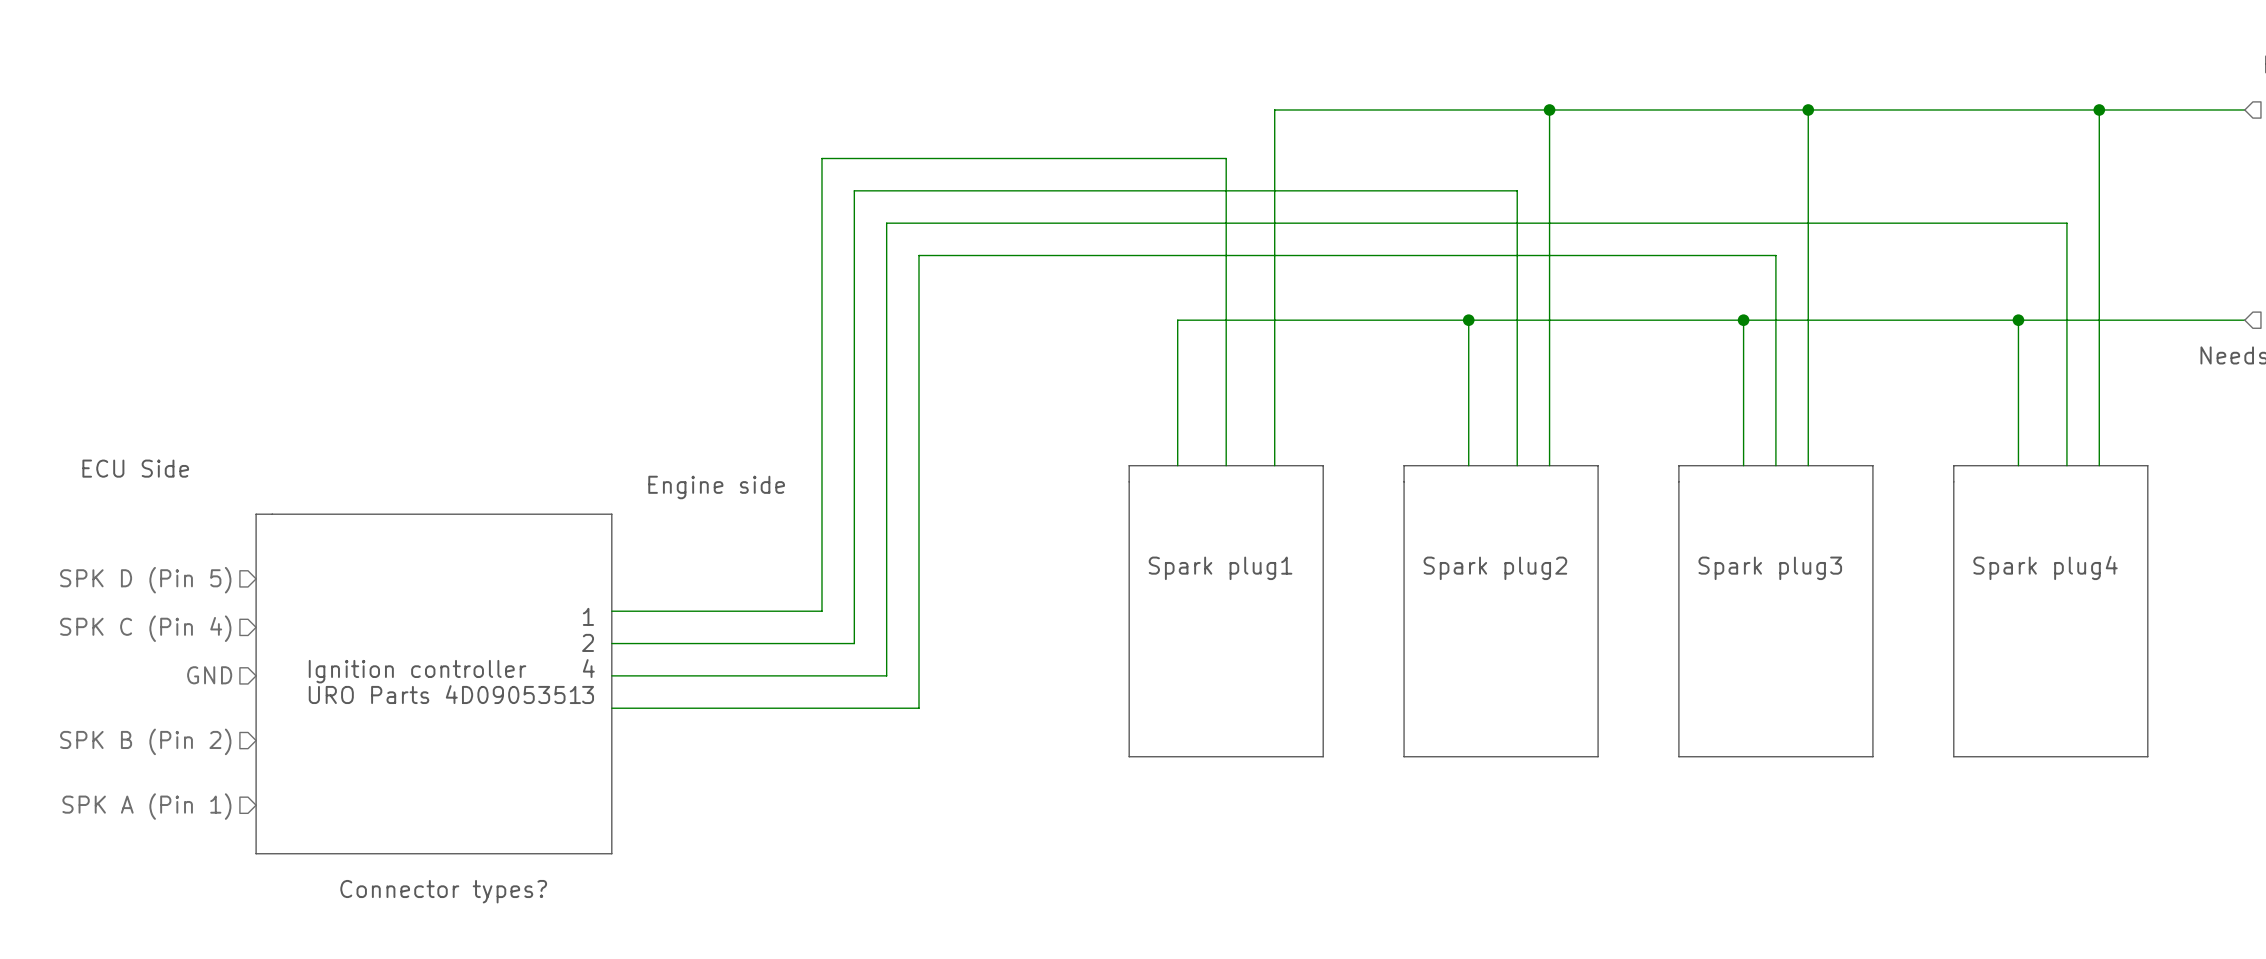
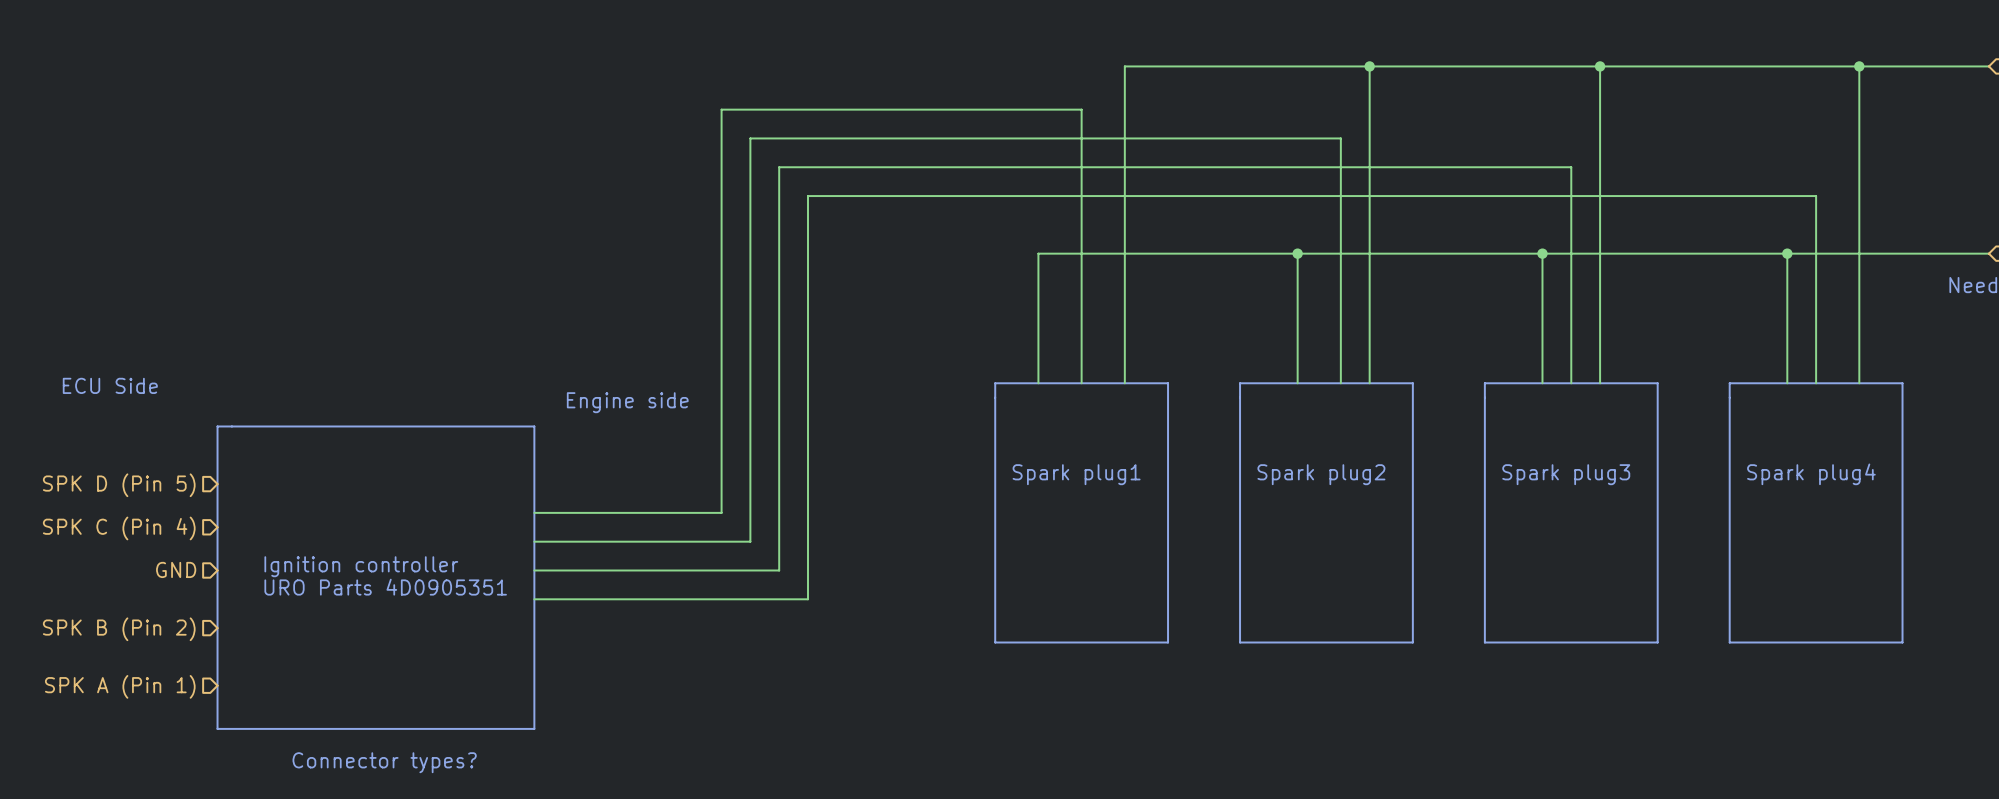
wire: (1775, 223) (2066, 223) (2066, 465) -> (1571, 167) (1571, 196) (1816, 196) (1816, 383)
text: 1 (588, 616) -> none
text: 2 (588, 642) -> none
text: 4 (588, 668) -> none
text: 3 (588, 694) -> none

